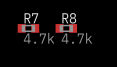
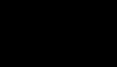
R7: 4.7k (28, 28) -> none
R8: 4.7k (66, 28) -> none

